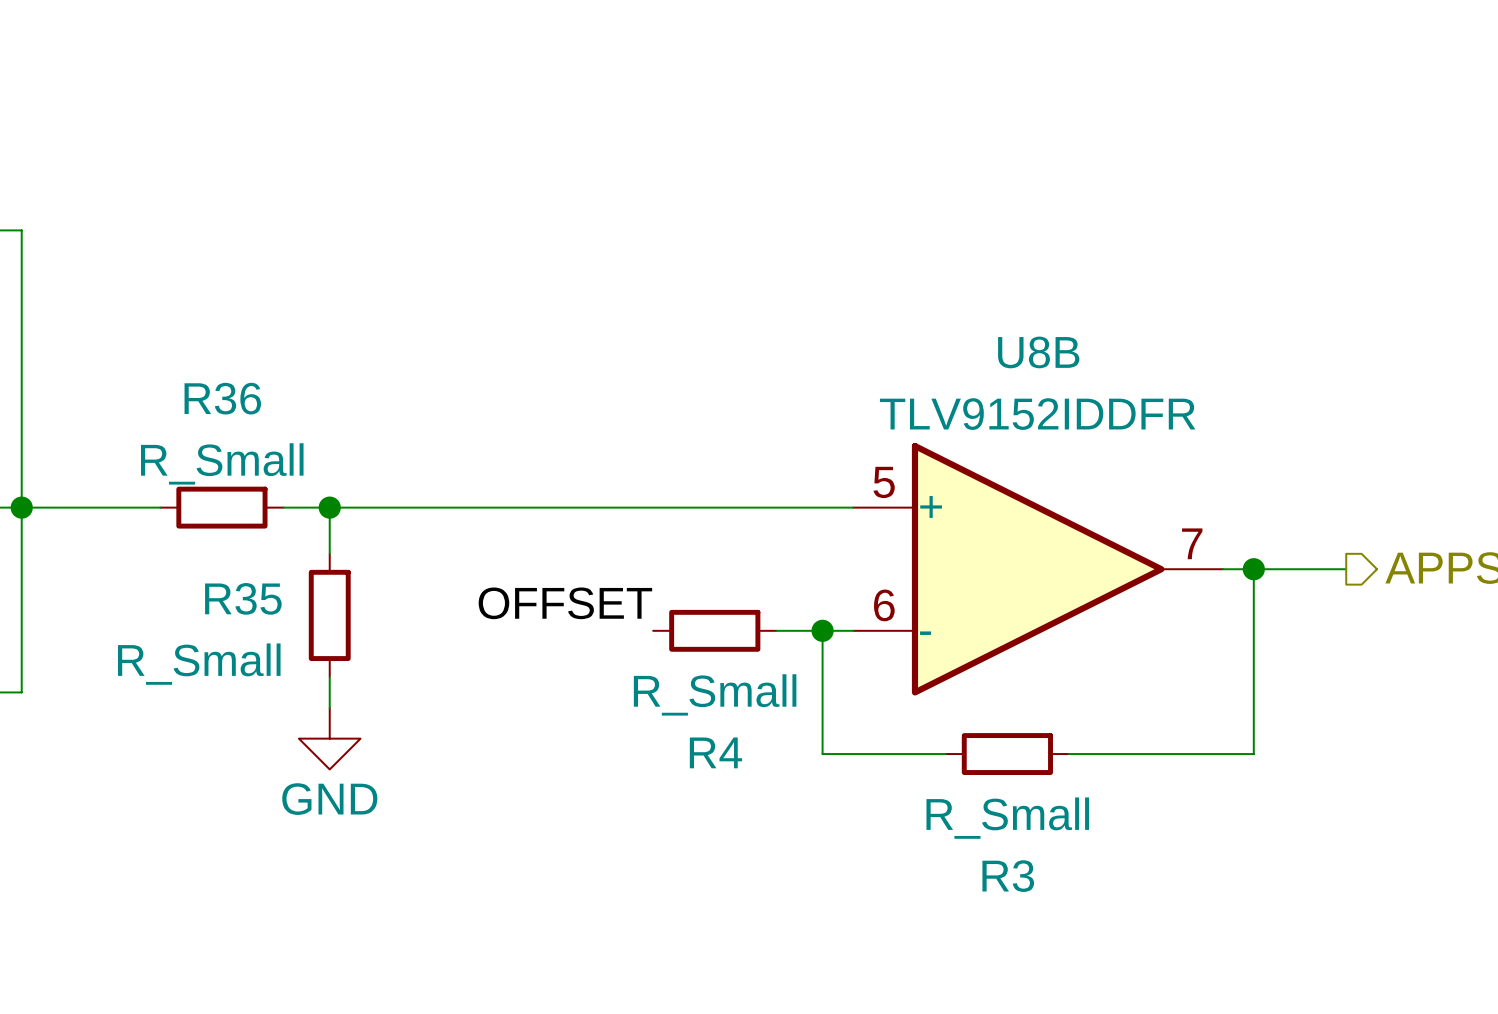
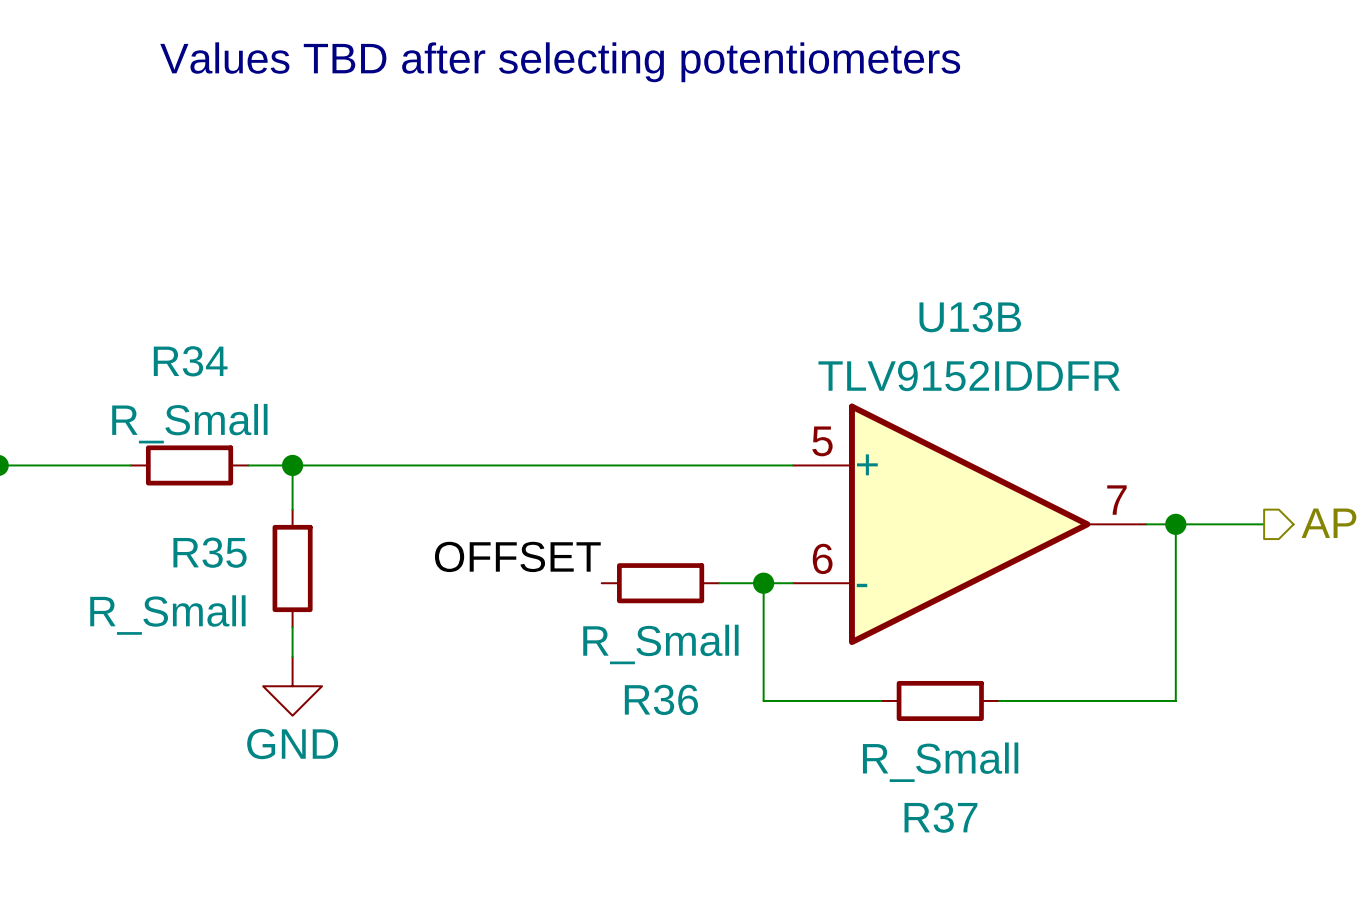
text: none -> Values TBD after selecting potentiometers (560, 62)
U8B name: U8B (1038, 352) -> U13B (970, 317)
R36 name: R36 (222, 398) -> R34 (190, 361)
R4 name: R4 (715, 752) -> R36 (661, 699)
R3 name: R3 (1008, 876) -> R37 (940, 817)

